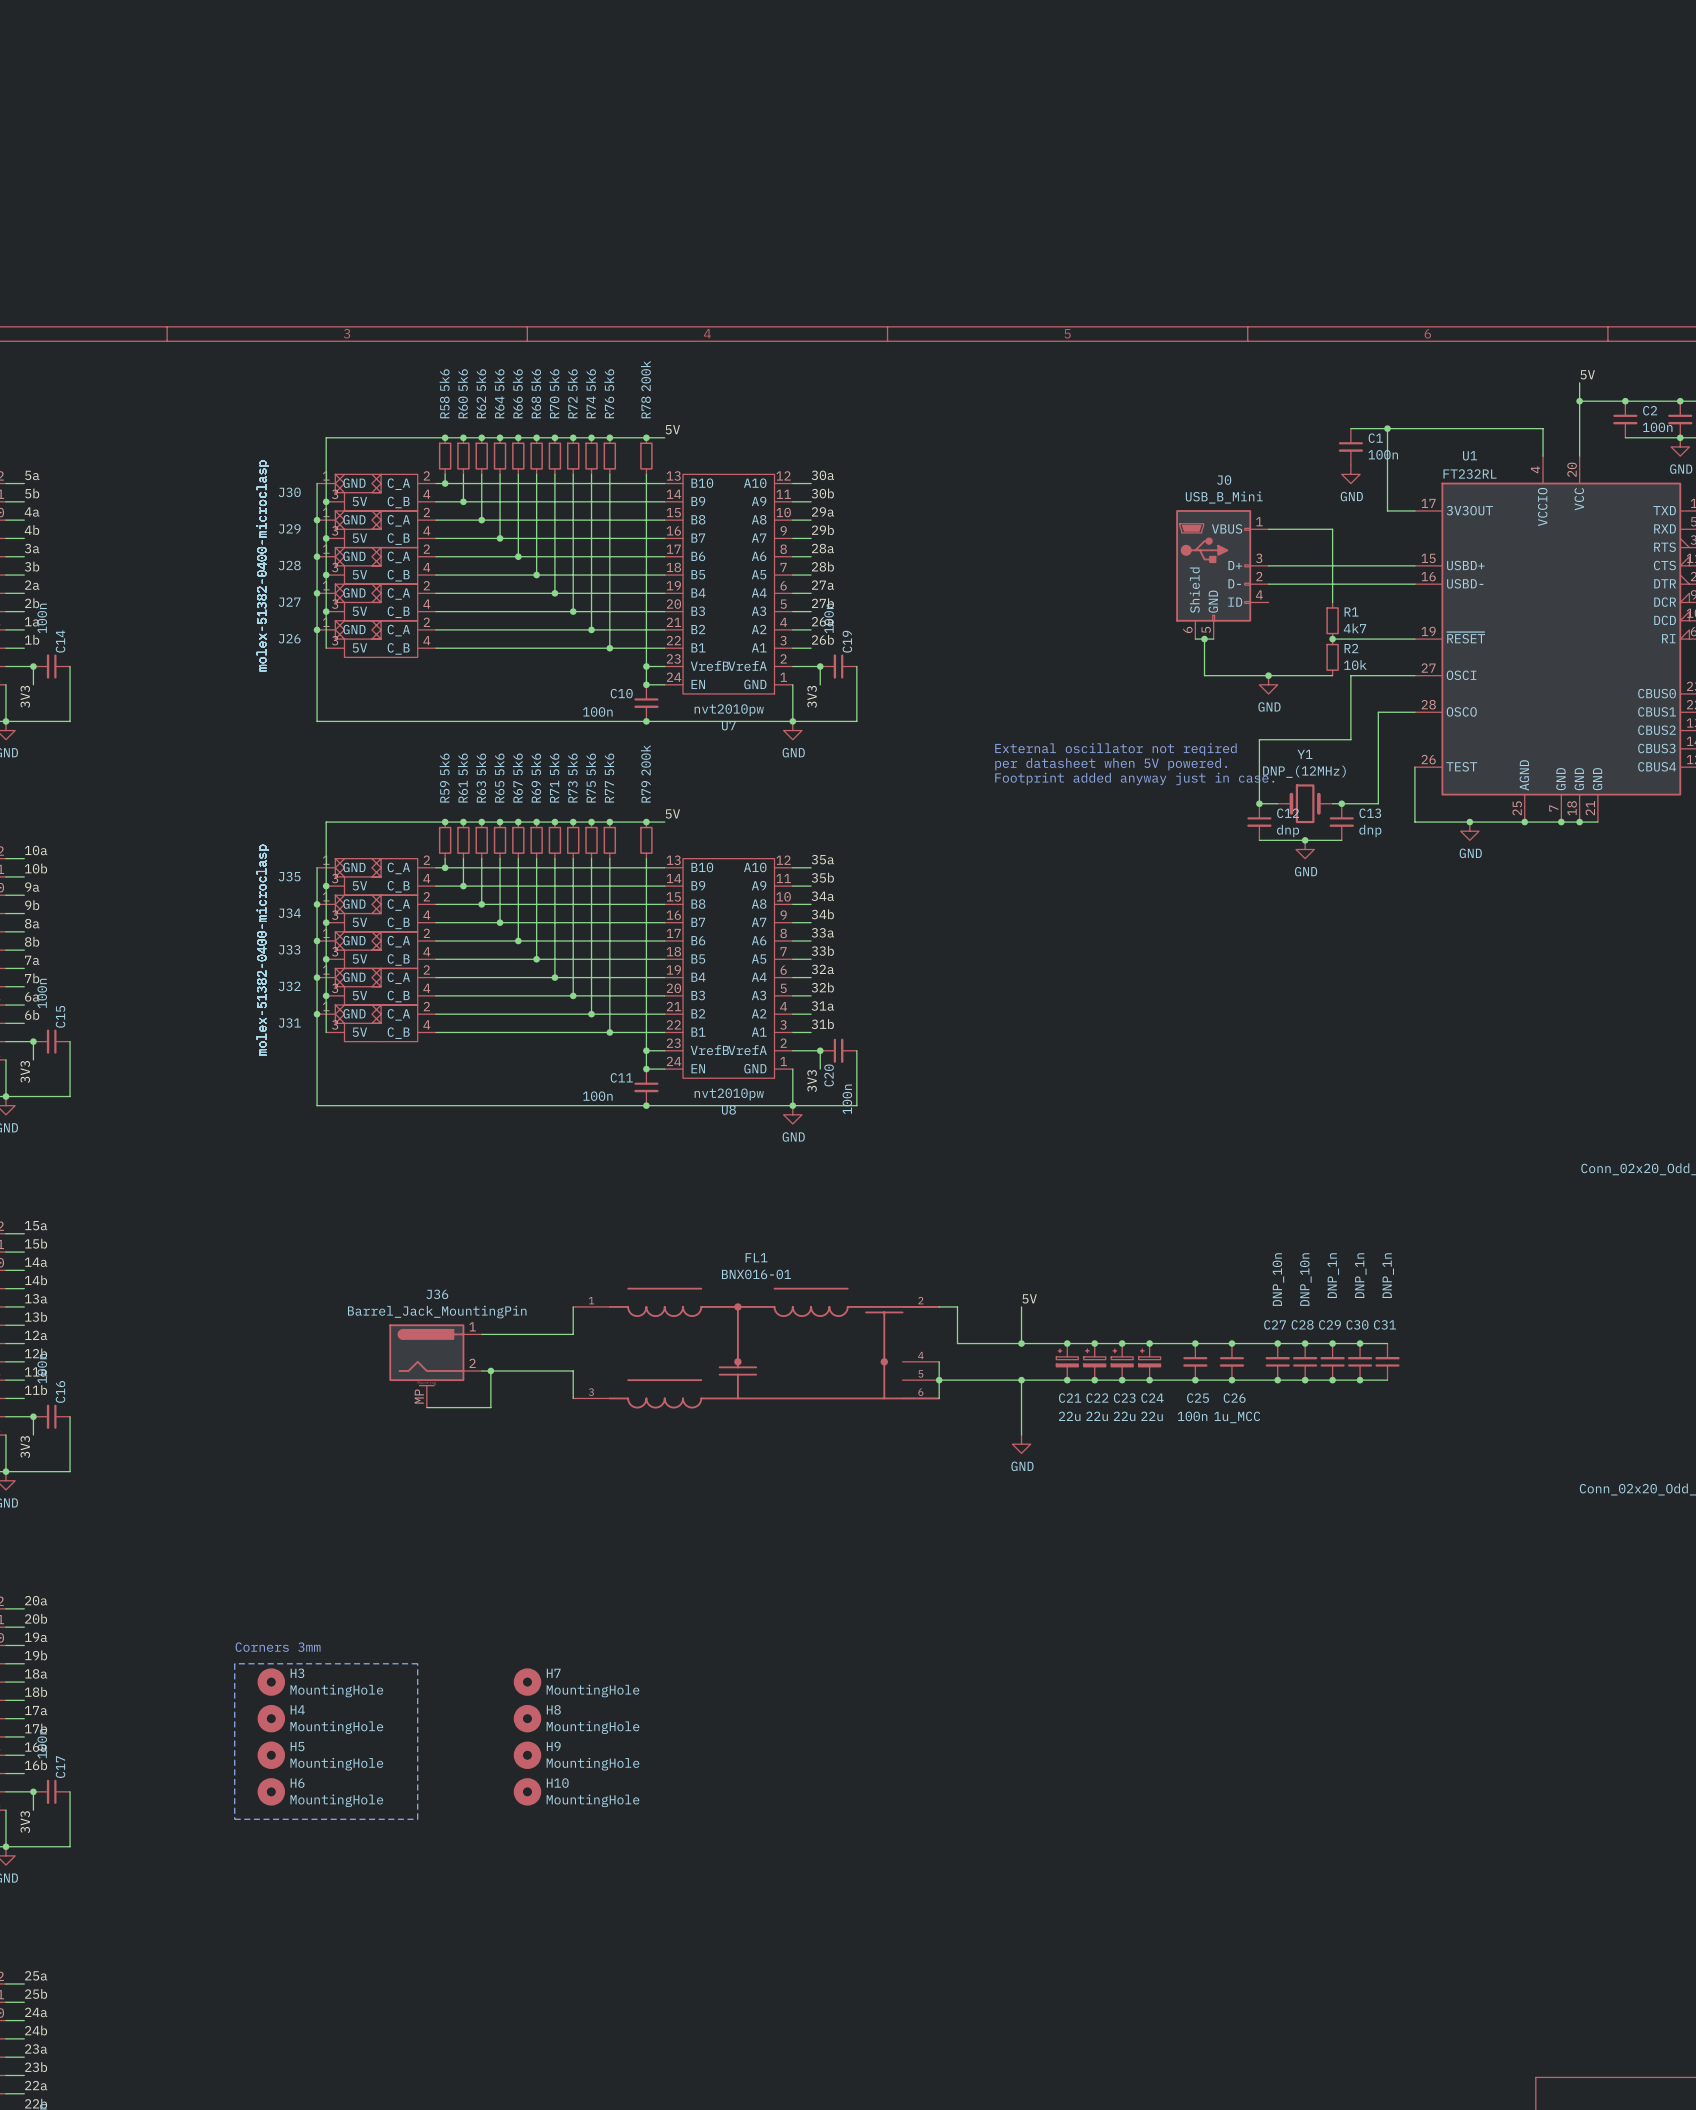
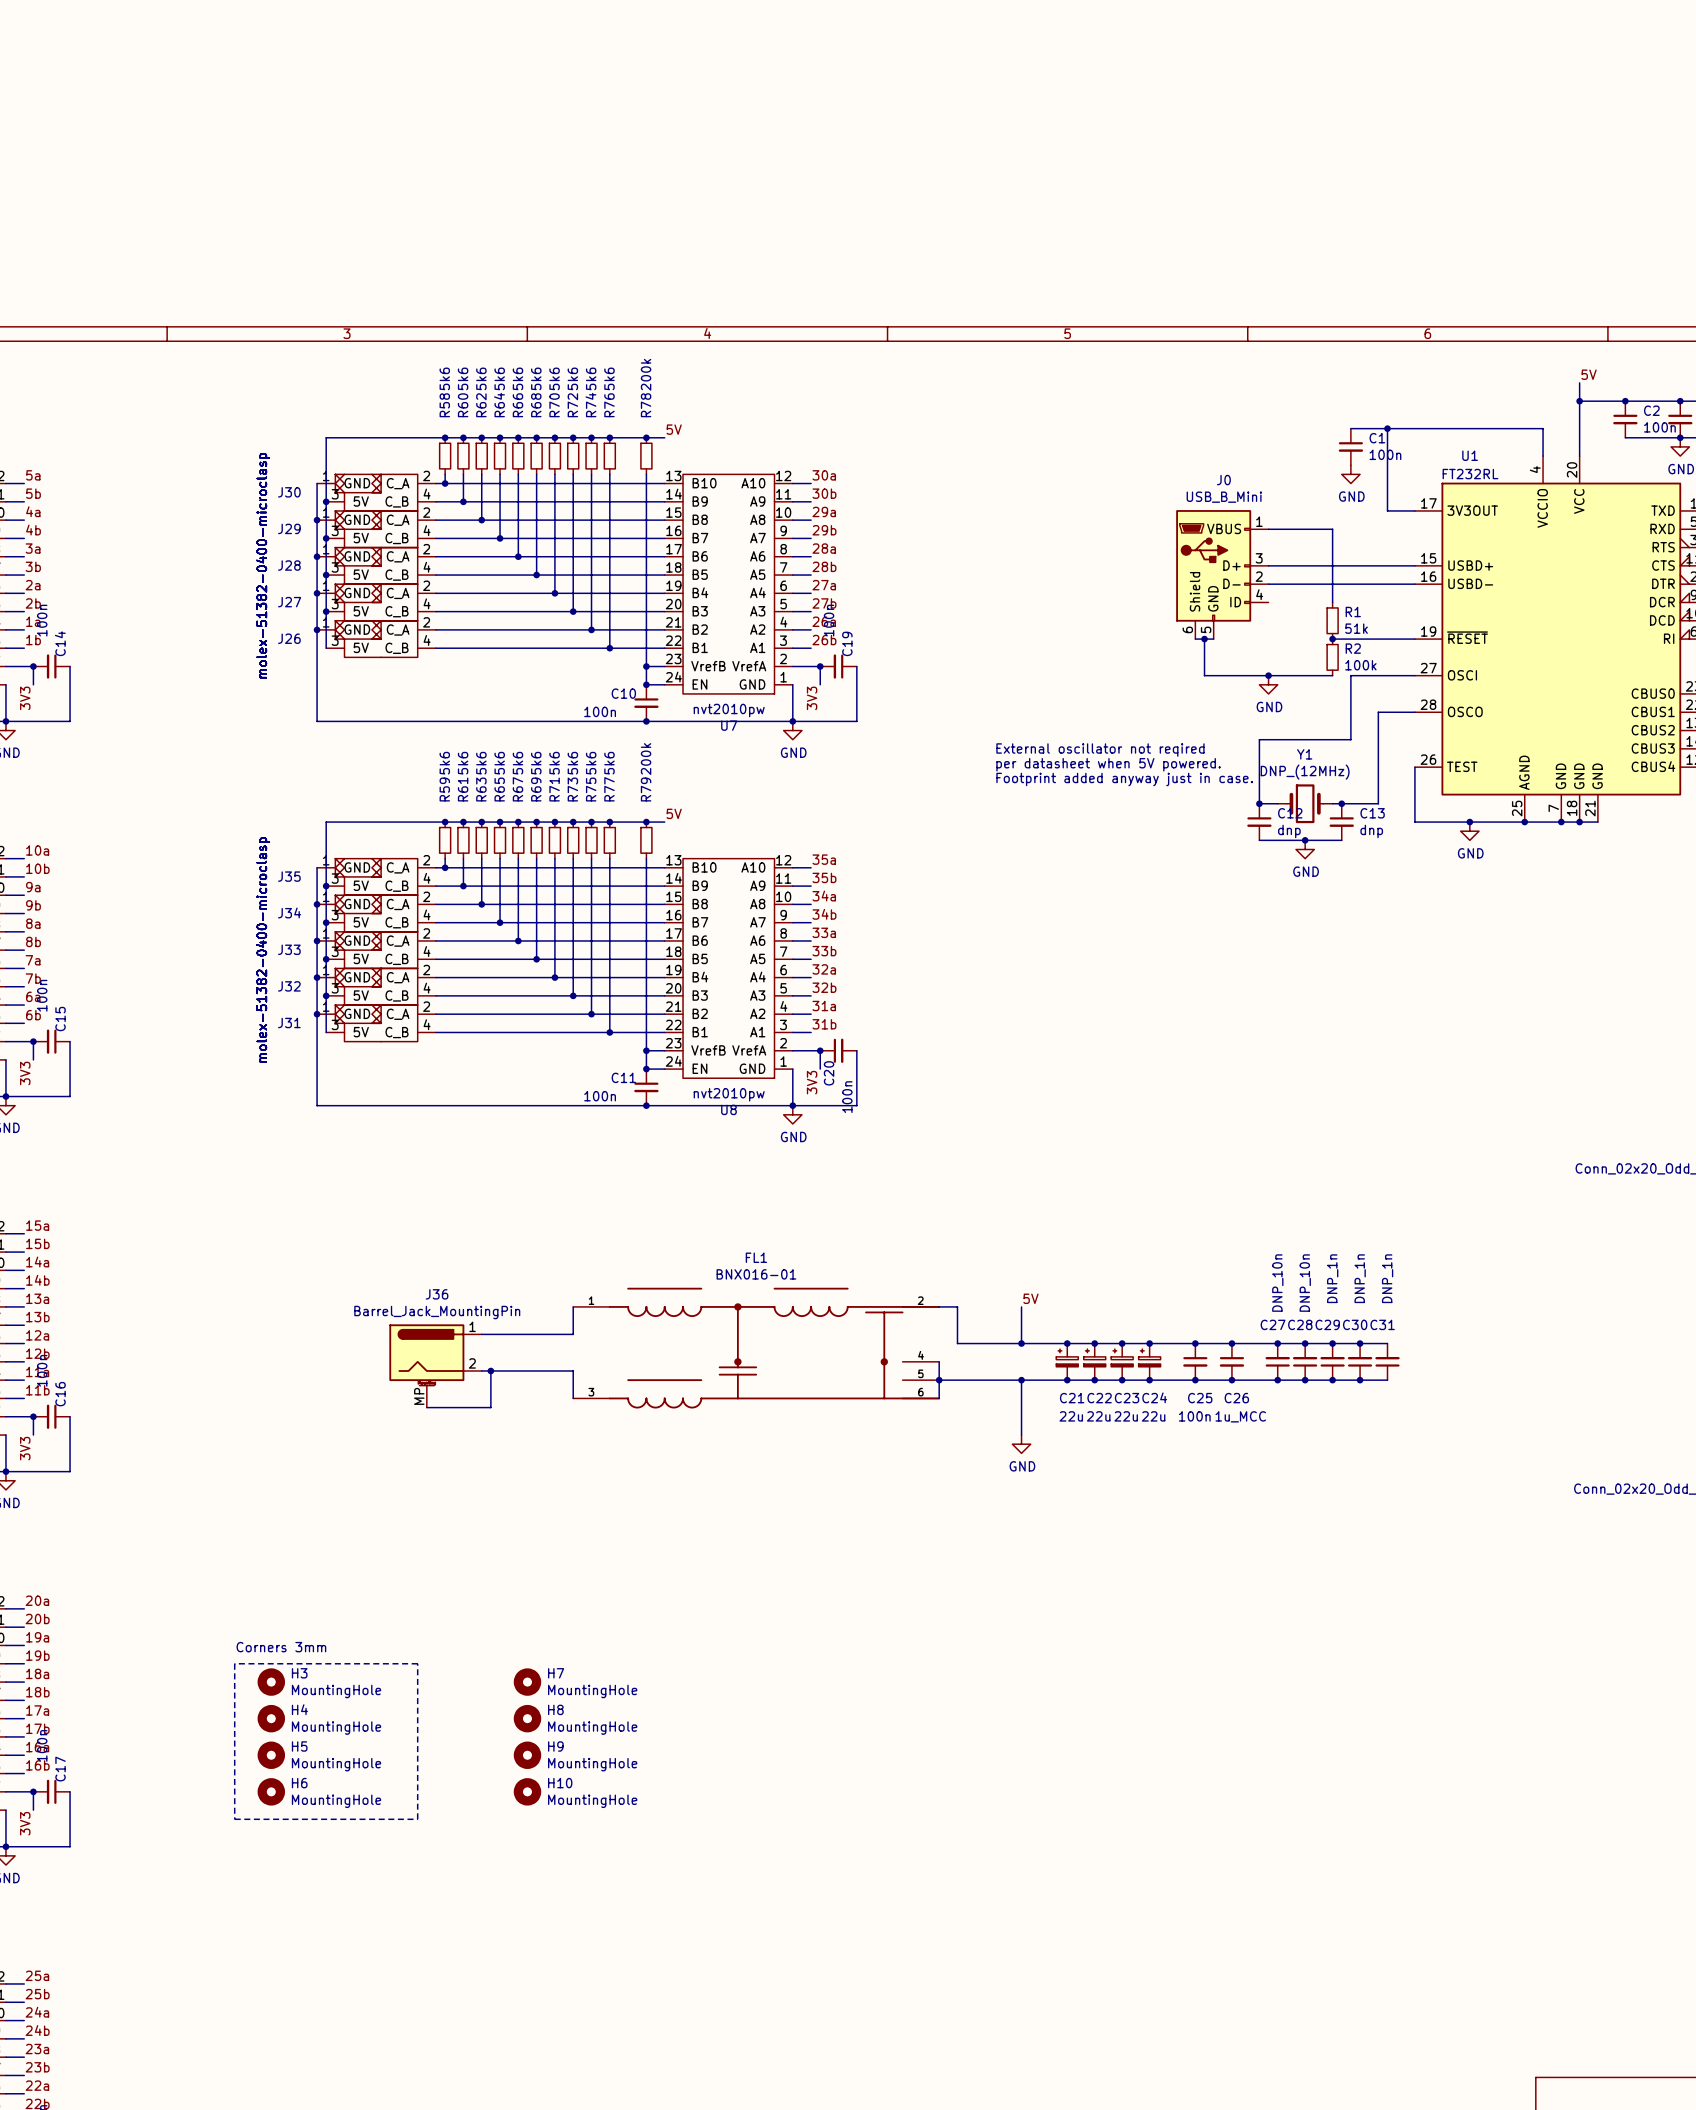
R1 value: 4k7 (1354, 628) -> 51k (1356, 628)
R2 value: 10k (1355, 665) -> 100k (1360, 665)

